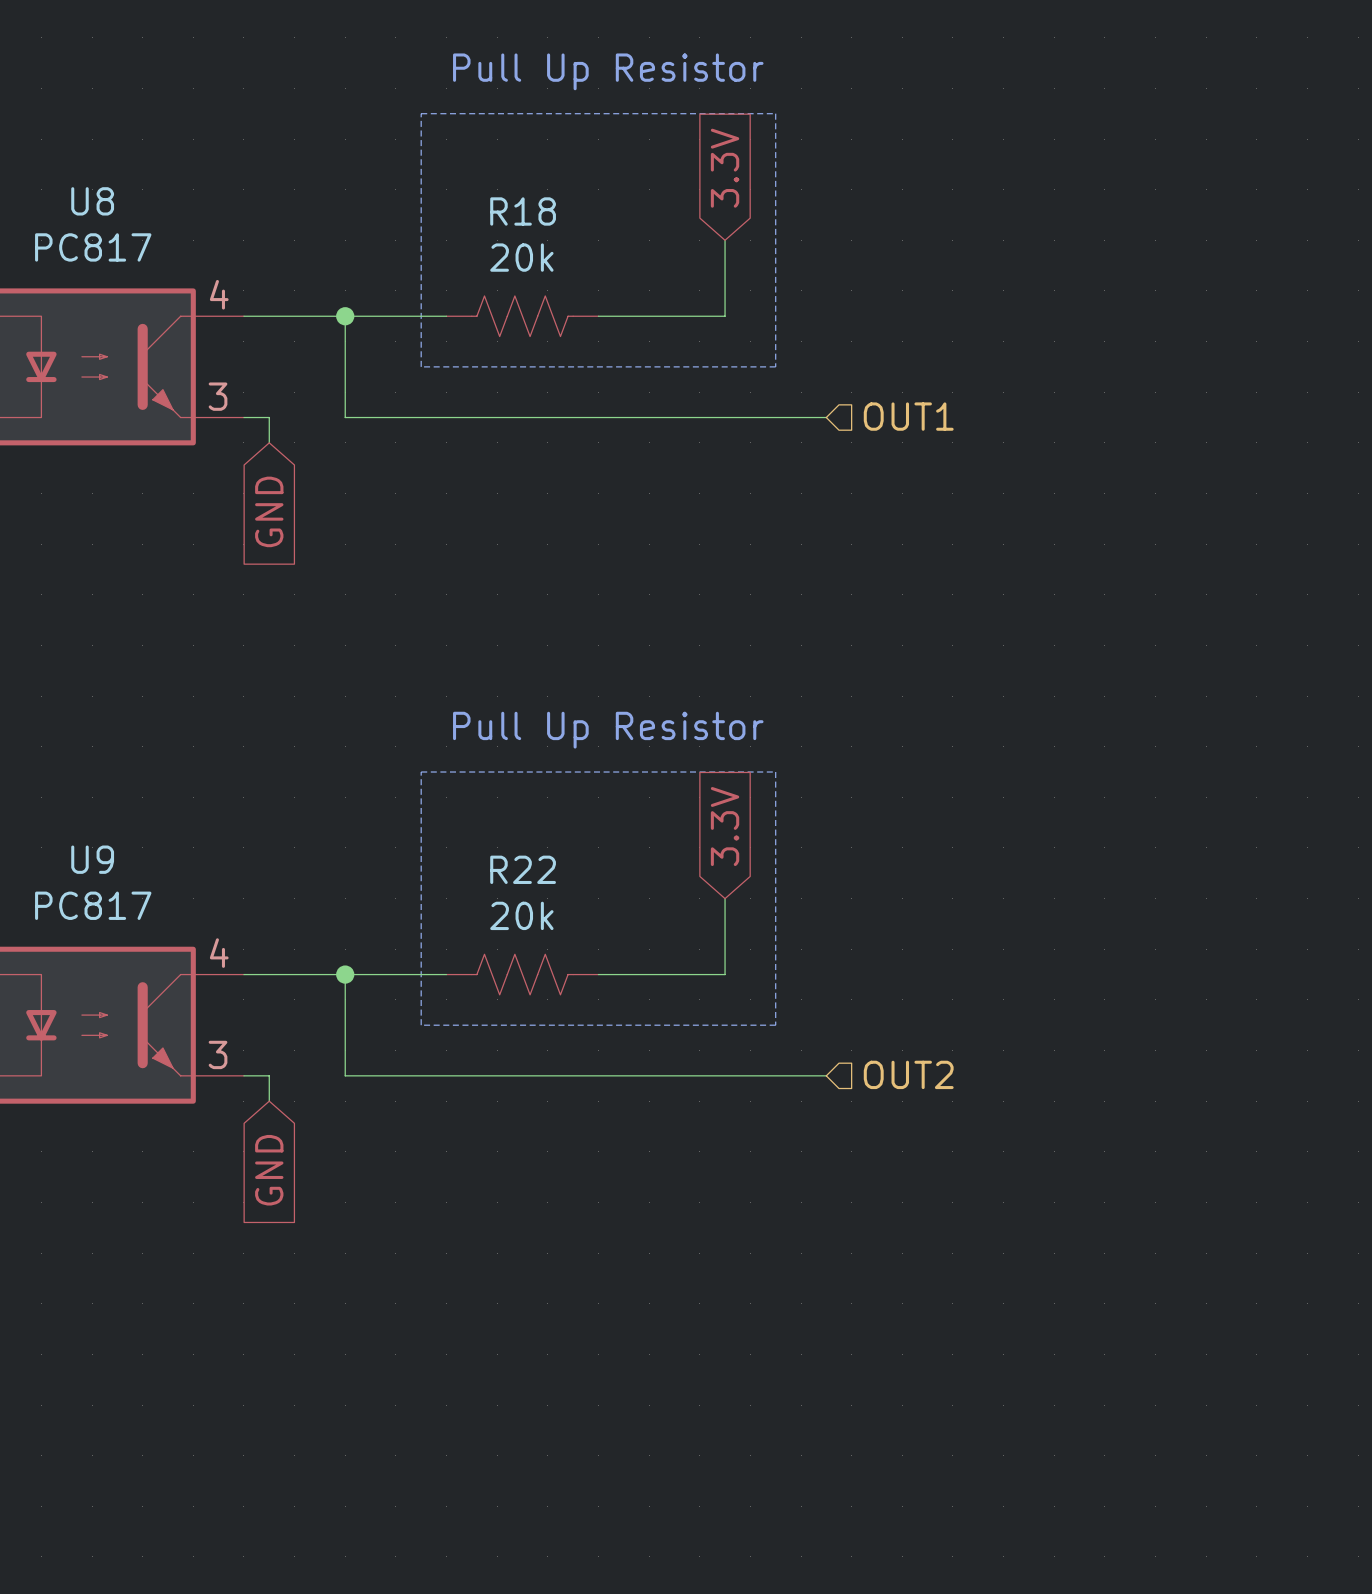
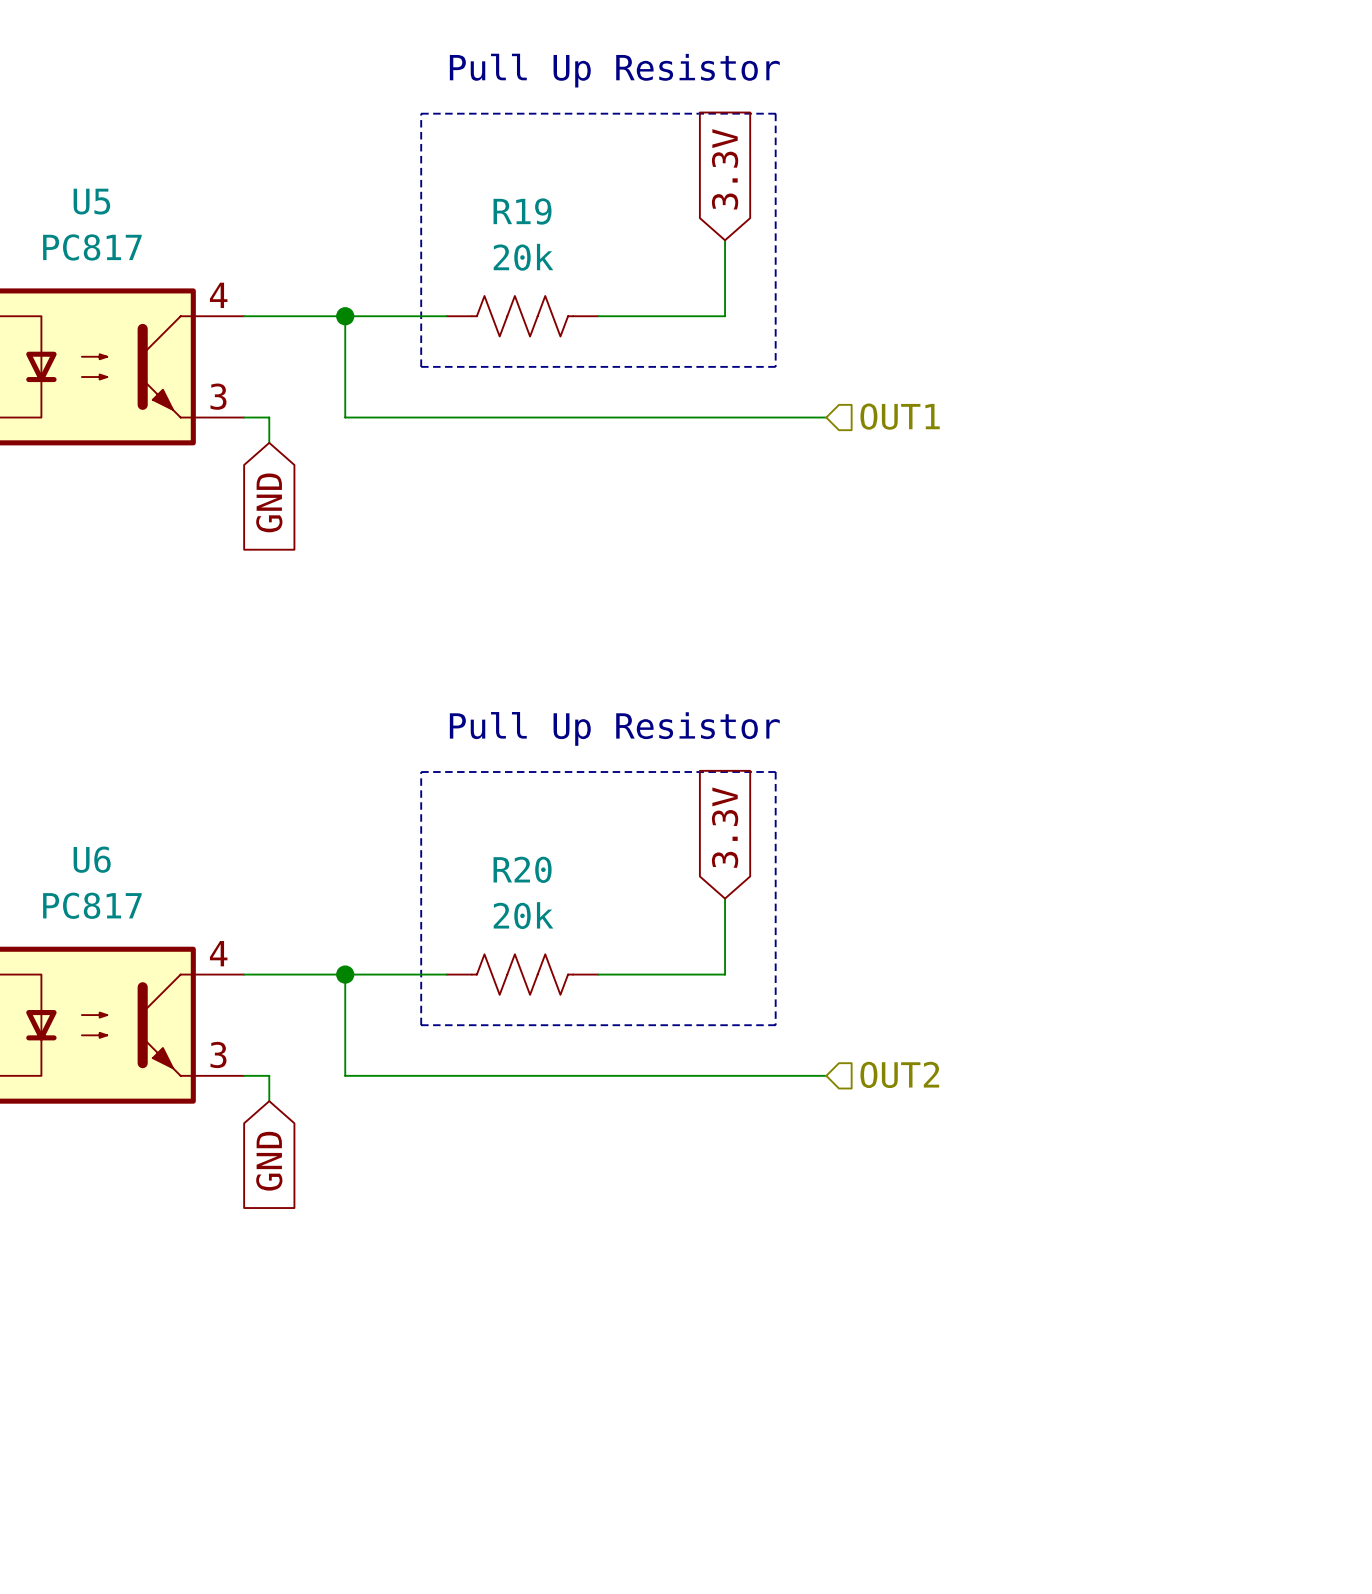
U8 name: U8 (92, 201) -> U5 (91, 201)
R18 name: R18 (523, 211) -> R19 (522, 211)
U9 name: U9 (92, 859) -> U6 (92, 859)
R22 name: R22 (523, 869) -> R20 (522, 869)

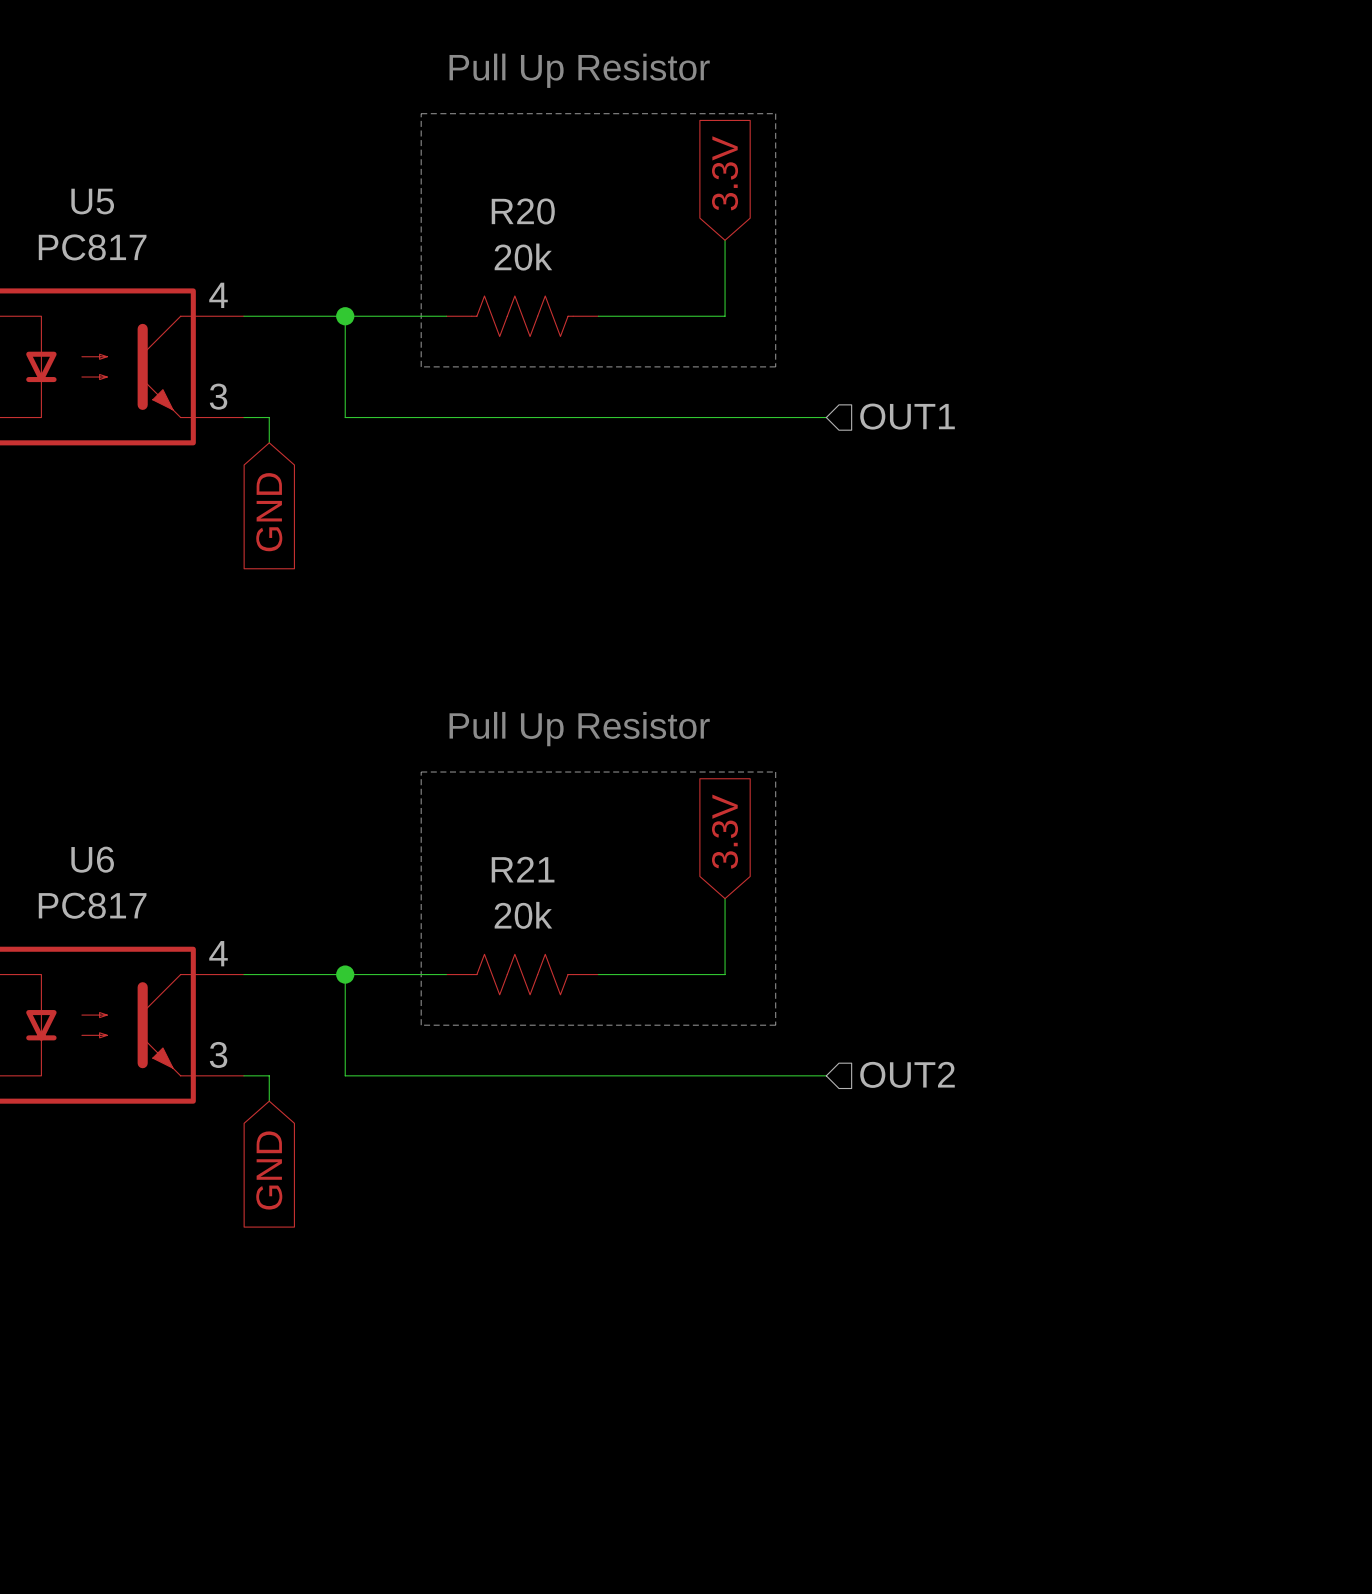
R19 name: R19 (522, 211) -> R20 (523, 211)
R20 name: R20 (522, 869) -> R21 (523, 869)

